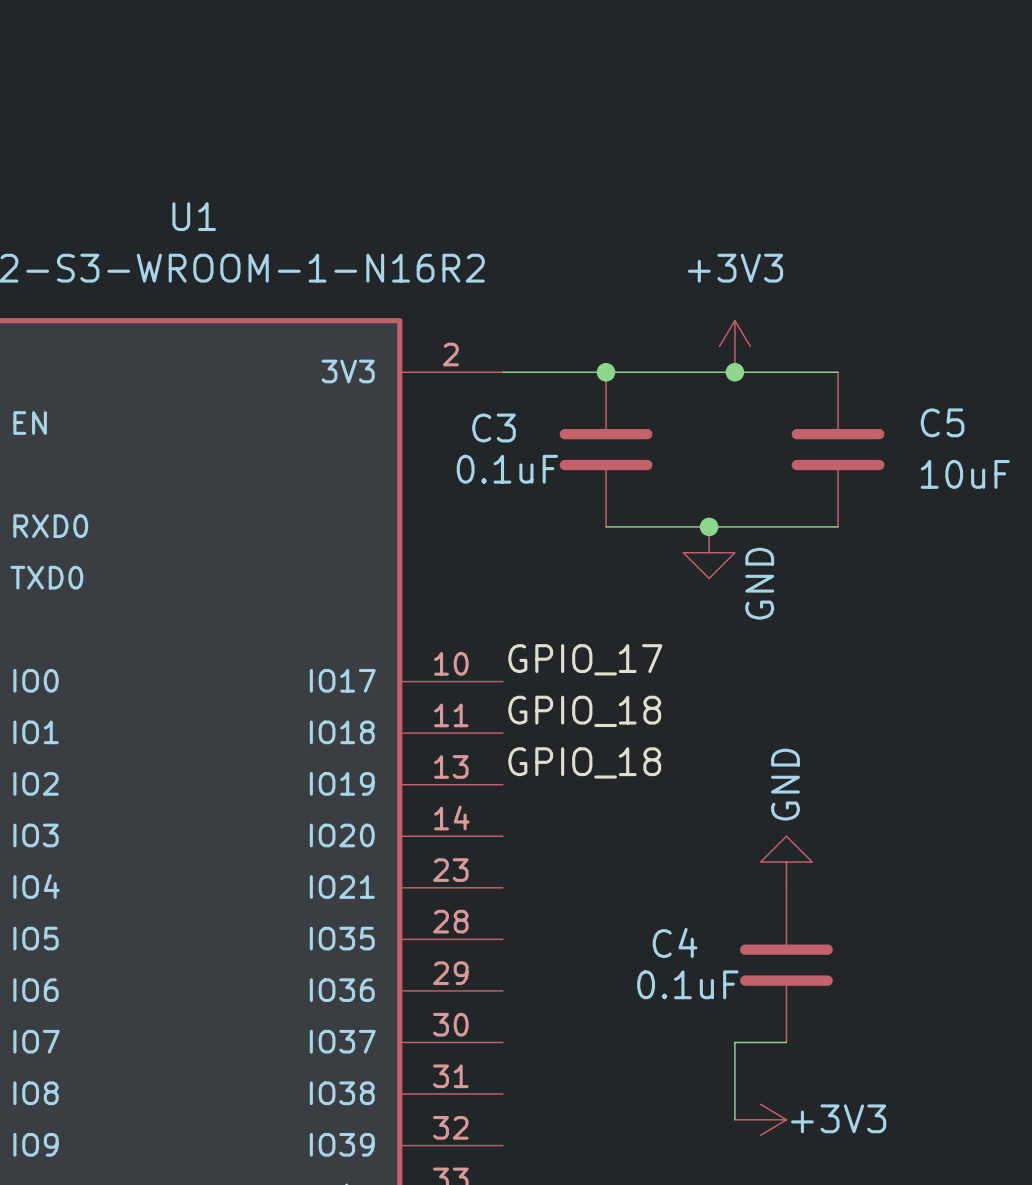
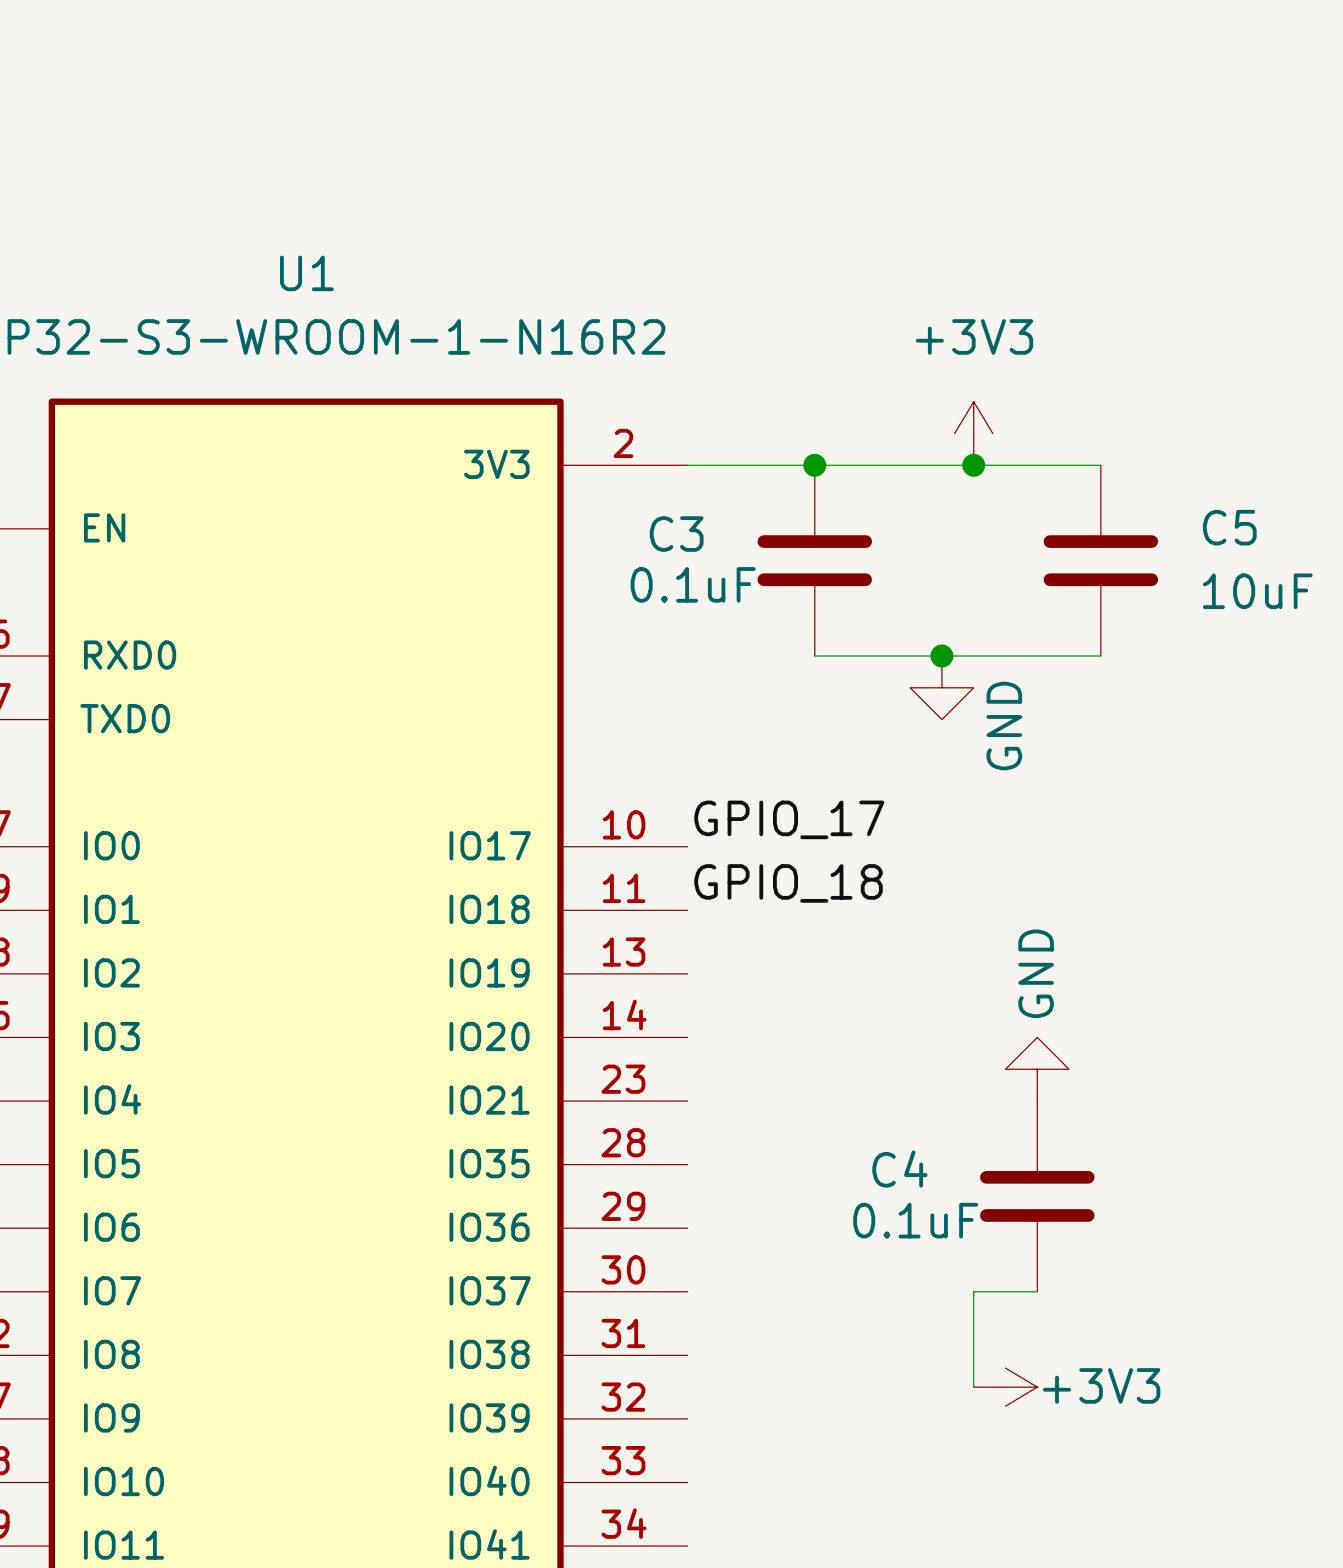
label: GPIO_18 (584, 762) -> none

